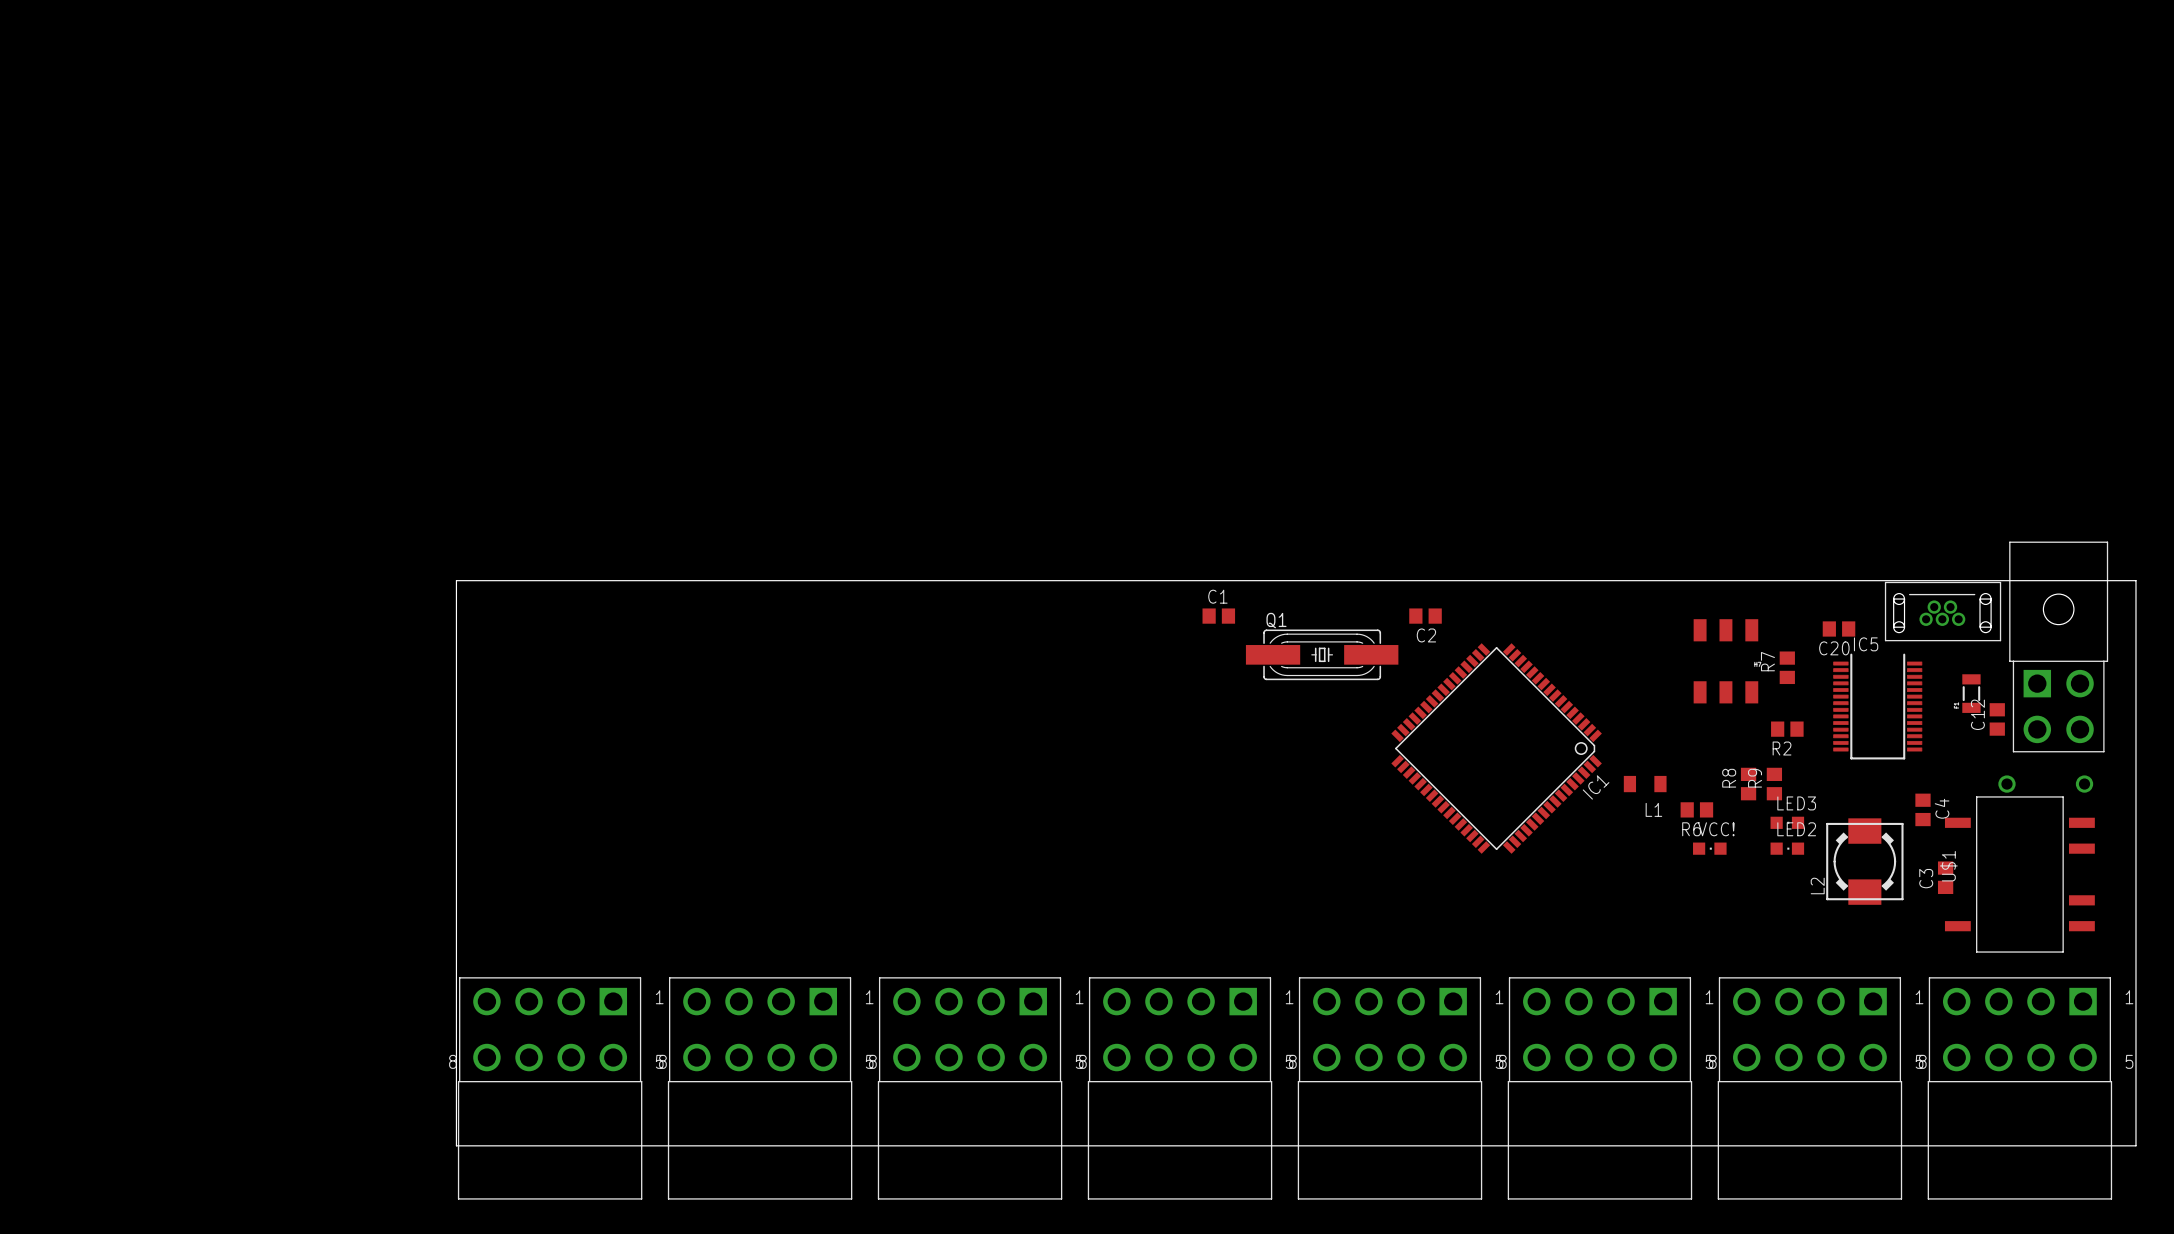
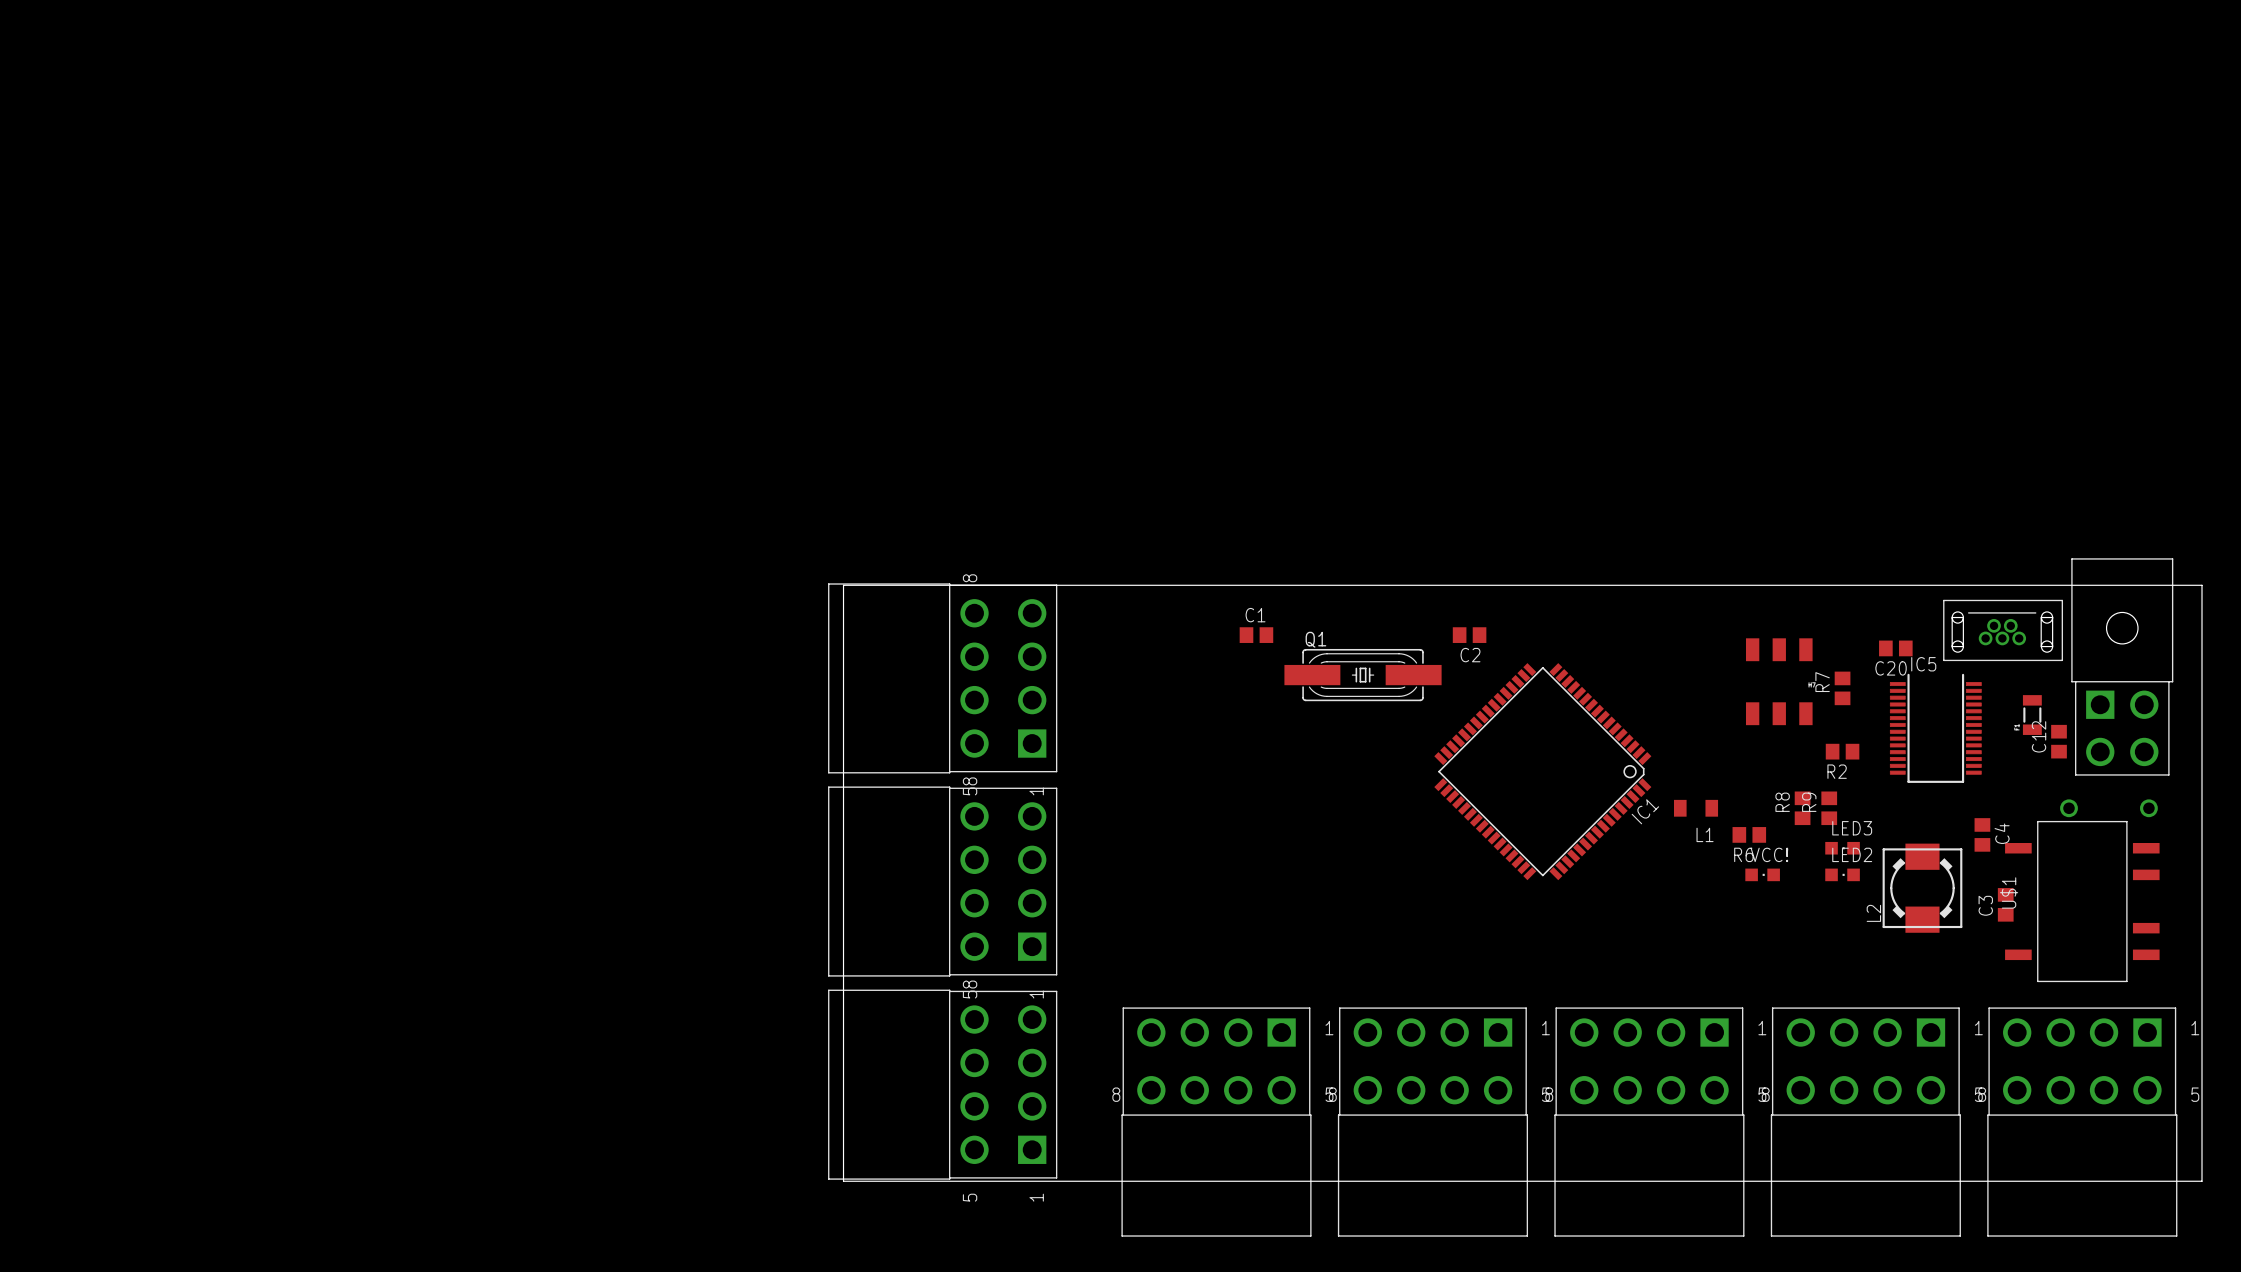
board edge: (2135, 580) (456, 580) (456, 1145) (818, 1145) -> (2202, 598) (2202, 585) (843, 585) (843, 1181)
part: none -> (942, 678)
part: none -> (942, 881)
part: none -> (942, 1084)
part: (550, 1088) -> none
part: (760, 1088) -> none
part: (970, 1088) -> none

